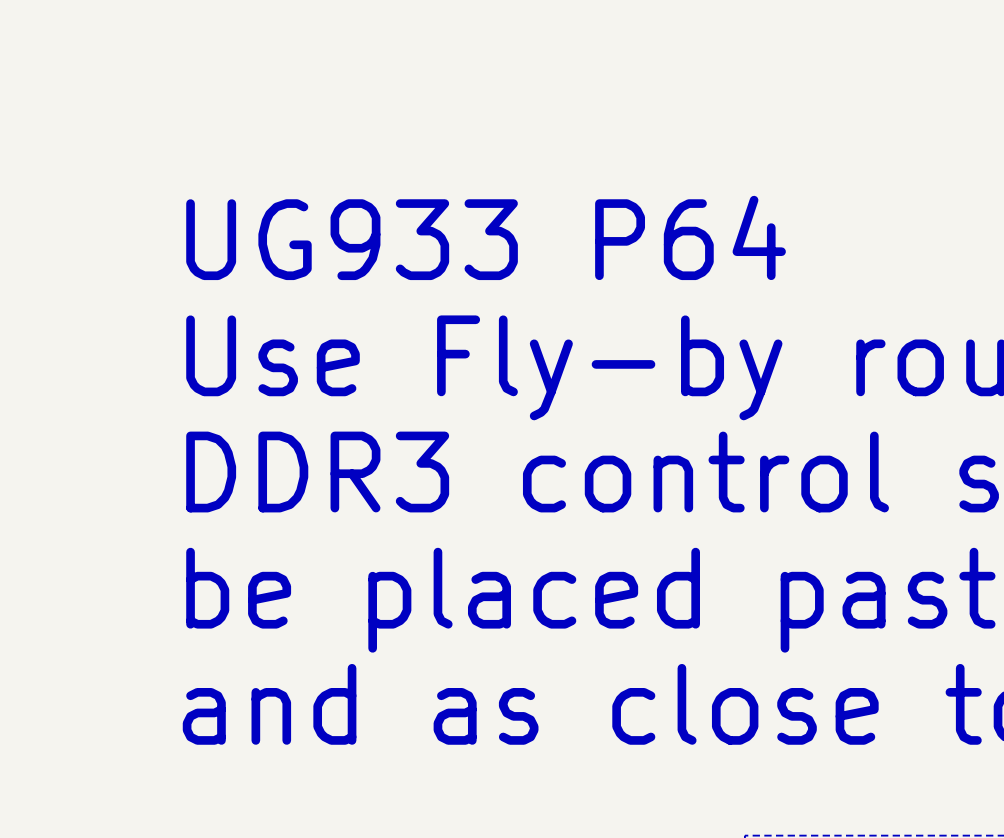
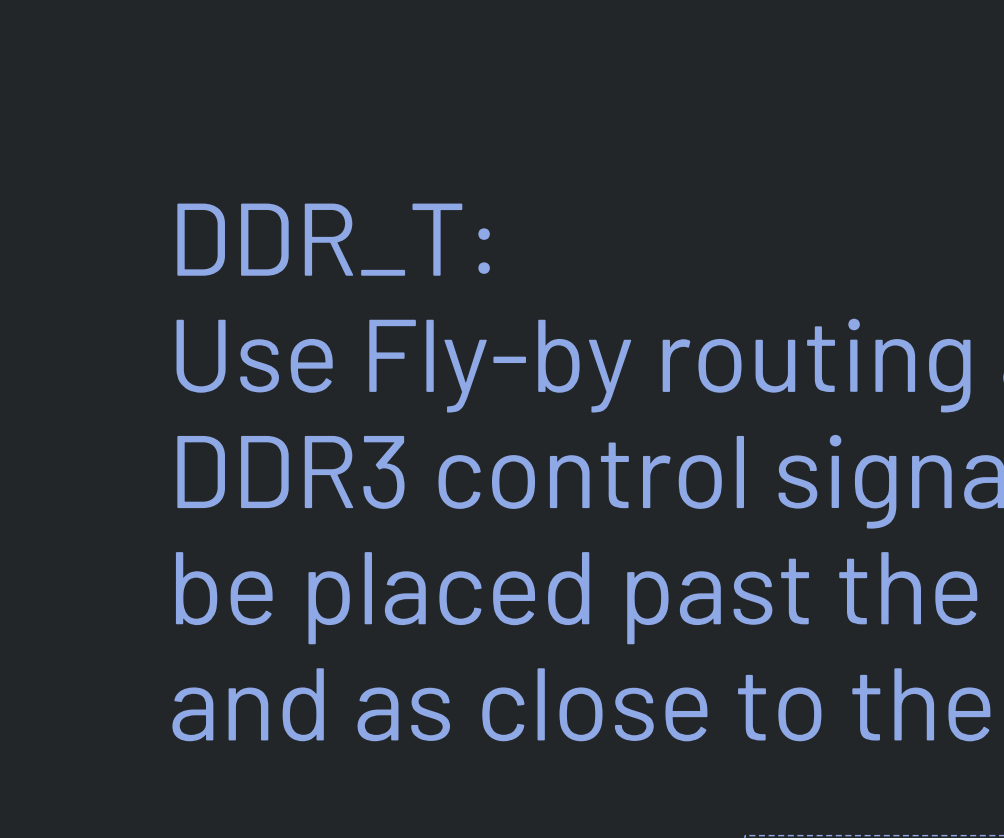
text: UG933 P64 (486, 237) -> DDR_T: (333, 239)

